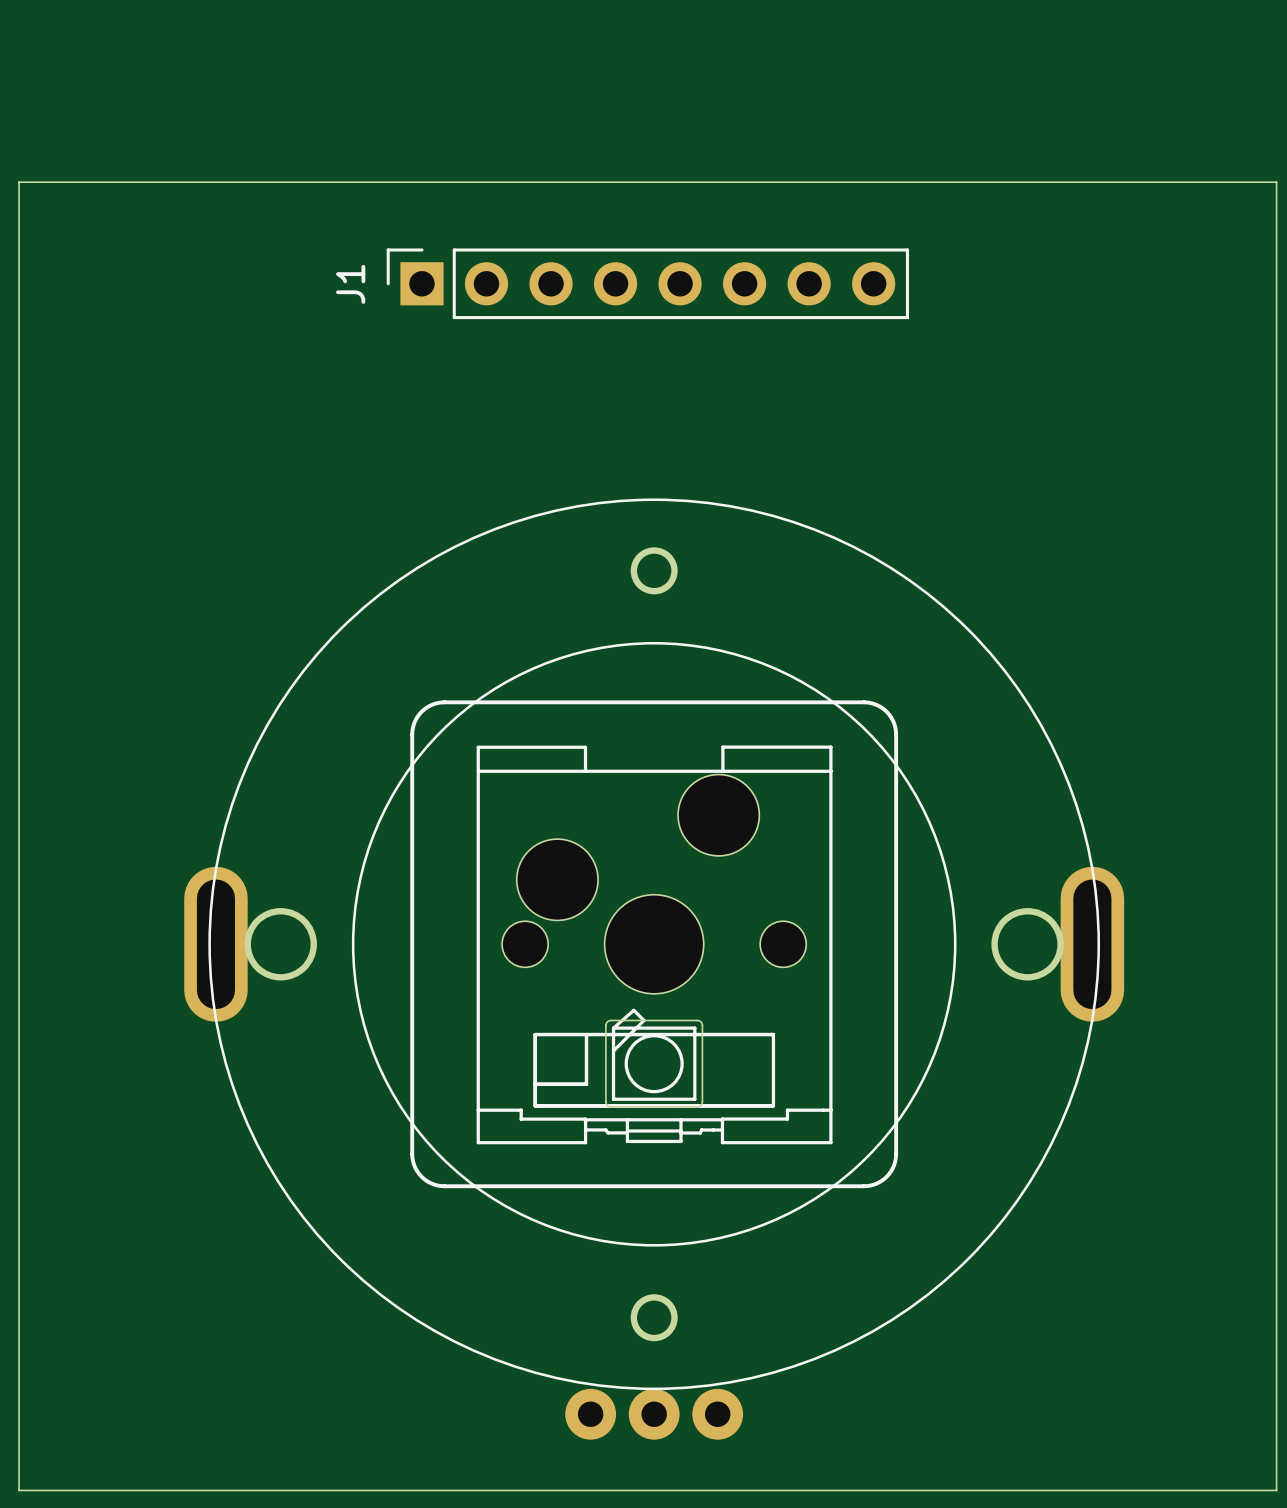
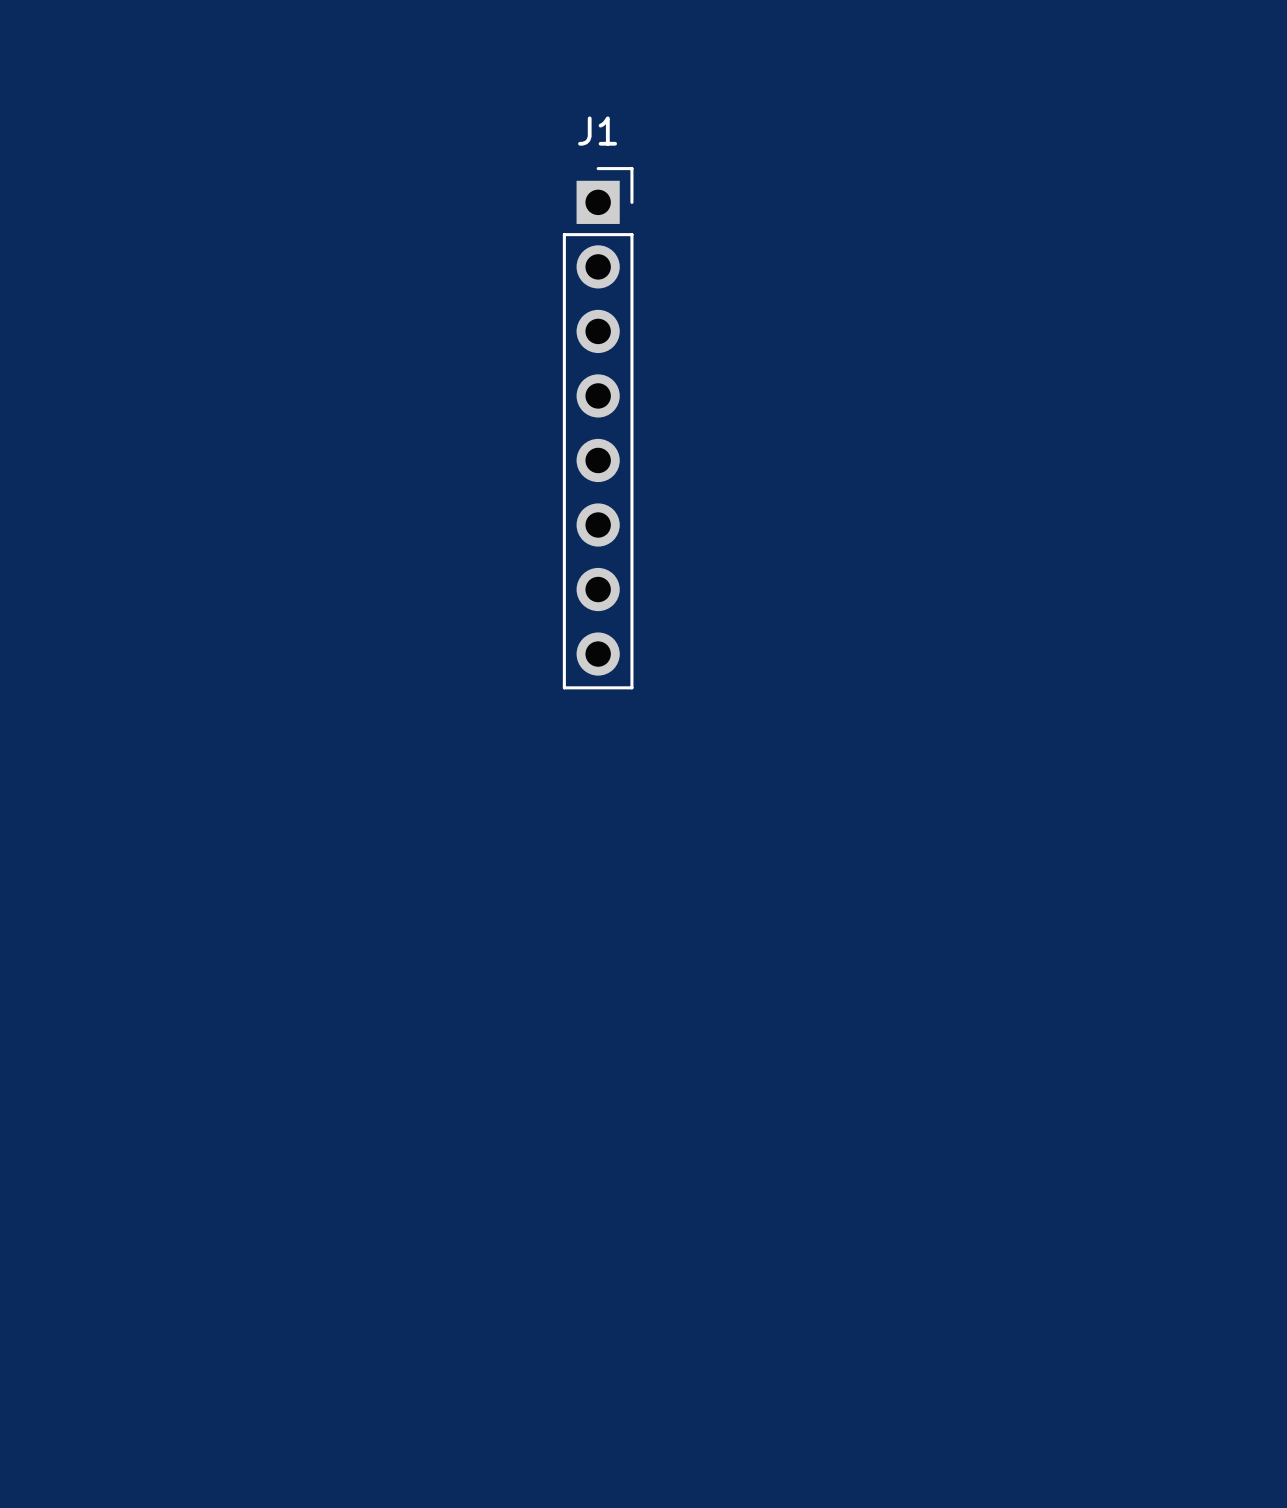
board edge: (19, 182) (1276, 182) (1276, 1490) (19, 1490) (19, 182) -> none
J1 rotation: 0° (647, 283) -> 90° clockwise (598, 428)
part: (654, 969) -> none

